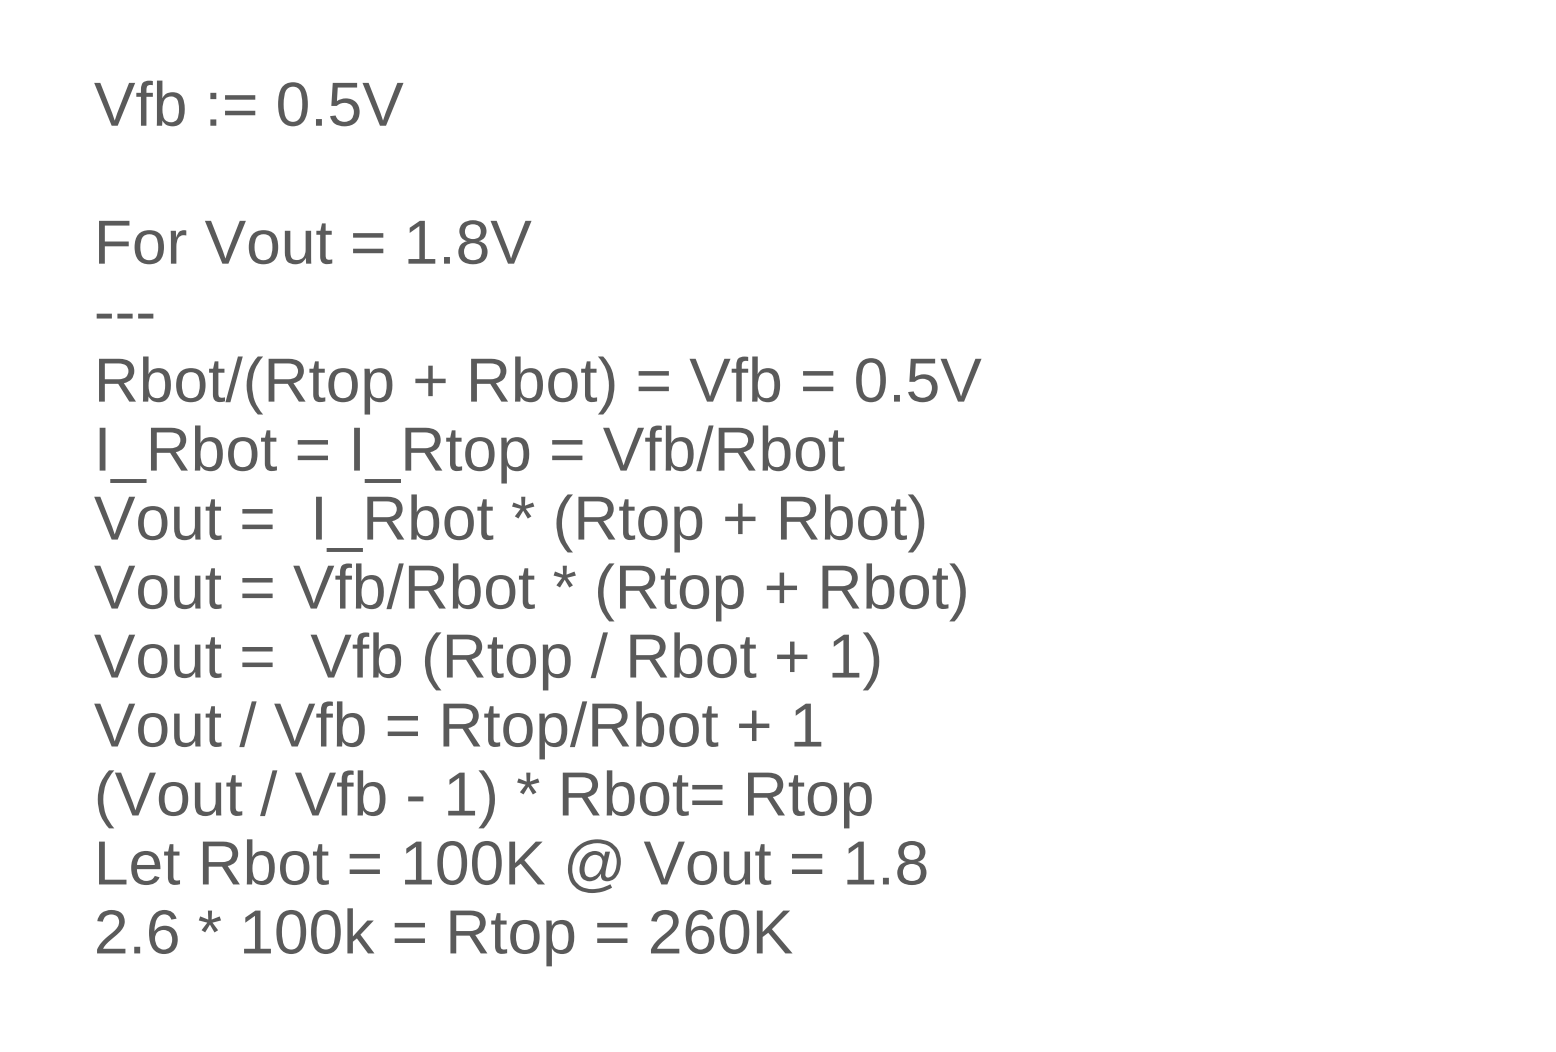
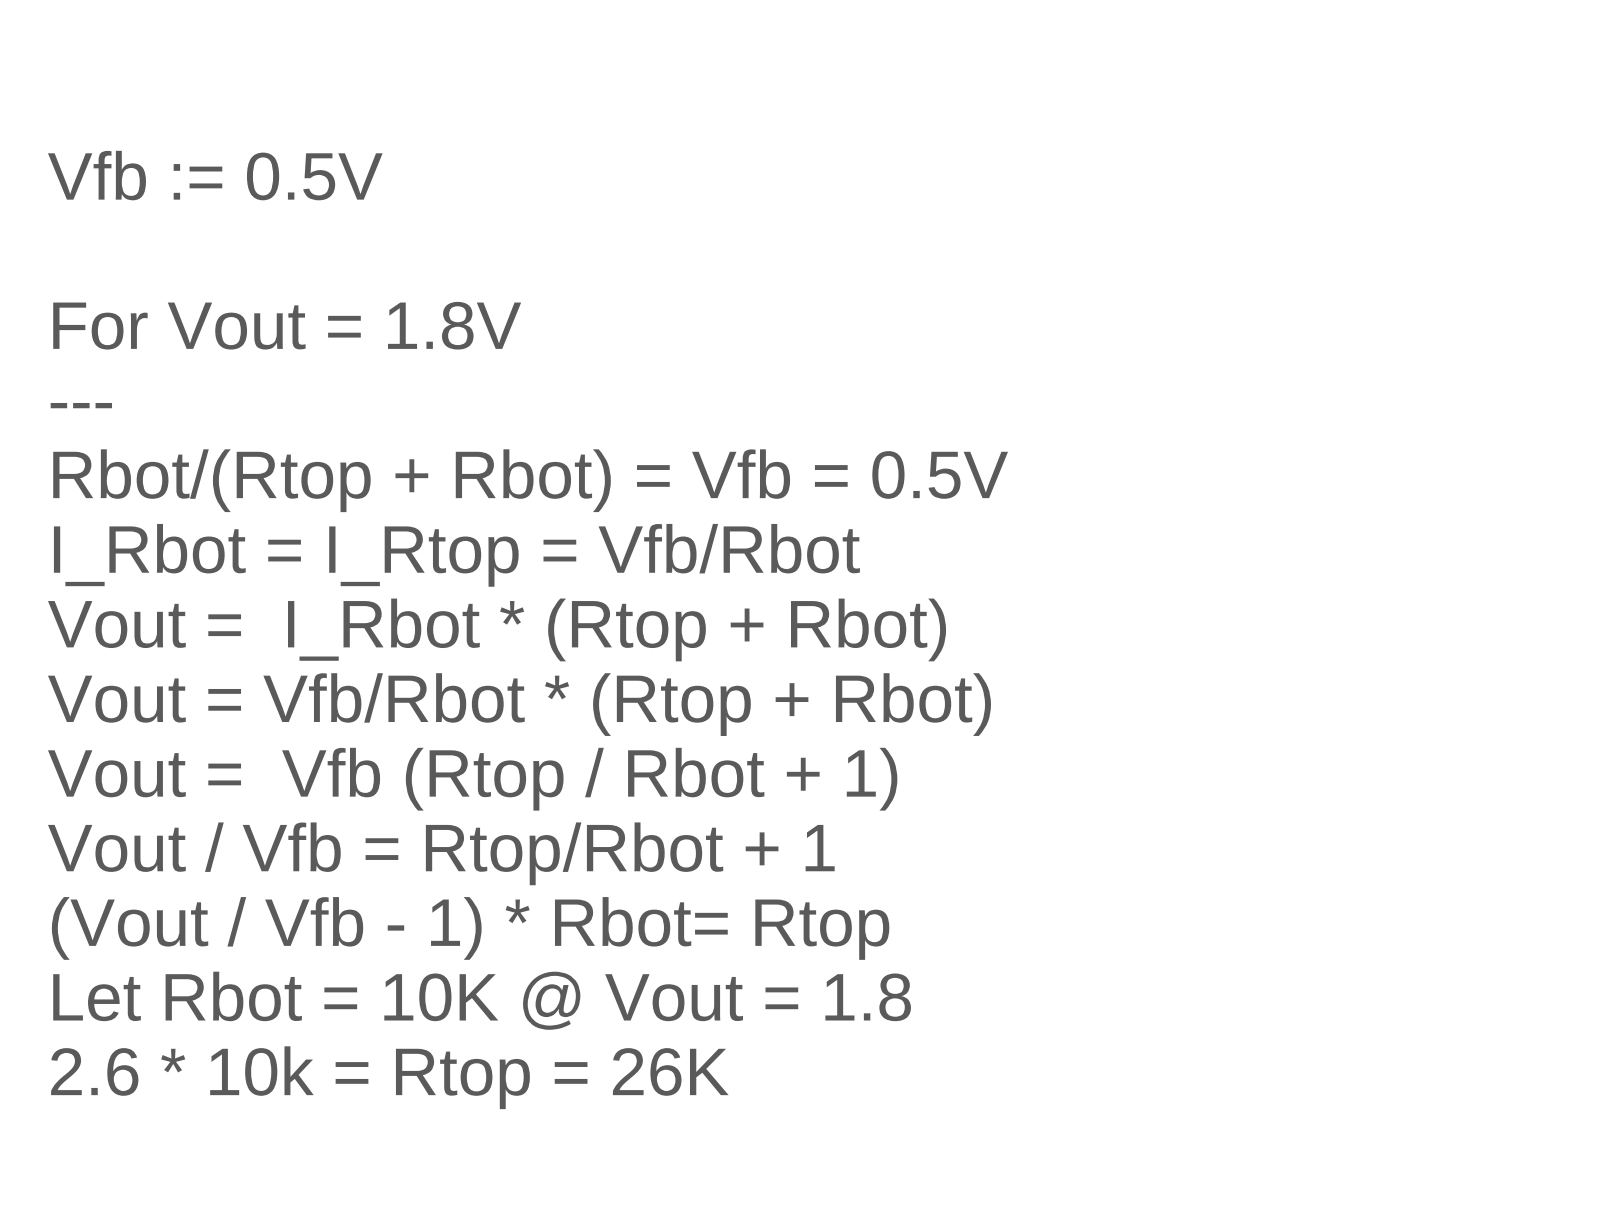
text: Let Rbot = 100K @ Vout = 1.8 (512, 866) -> Let Rbot = 10K @ Vout = 1.8 (482, 1000)
text: 2.6 * 100k = Rtop = 260K (444, 937) -> 2.6 * 10k = Rtop = 26K (389, 1077)

